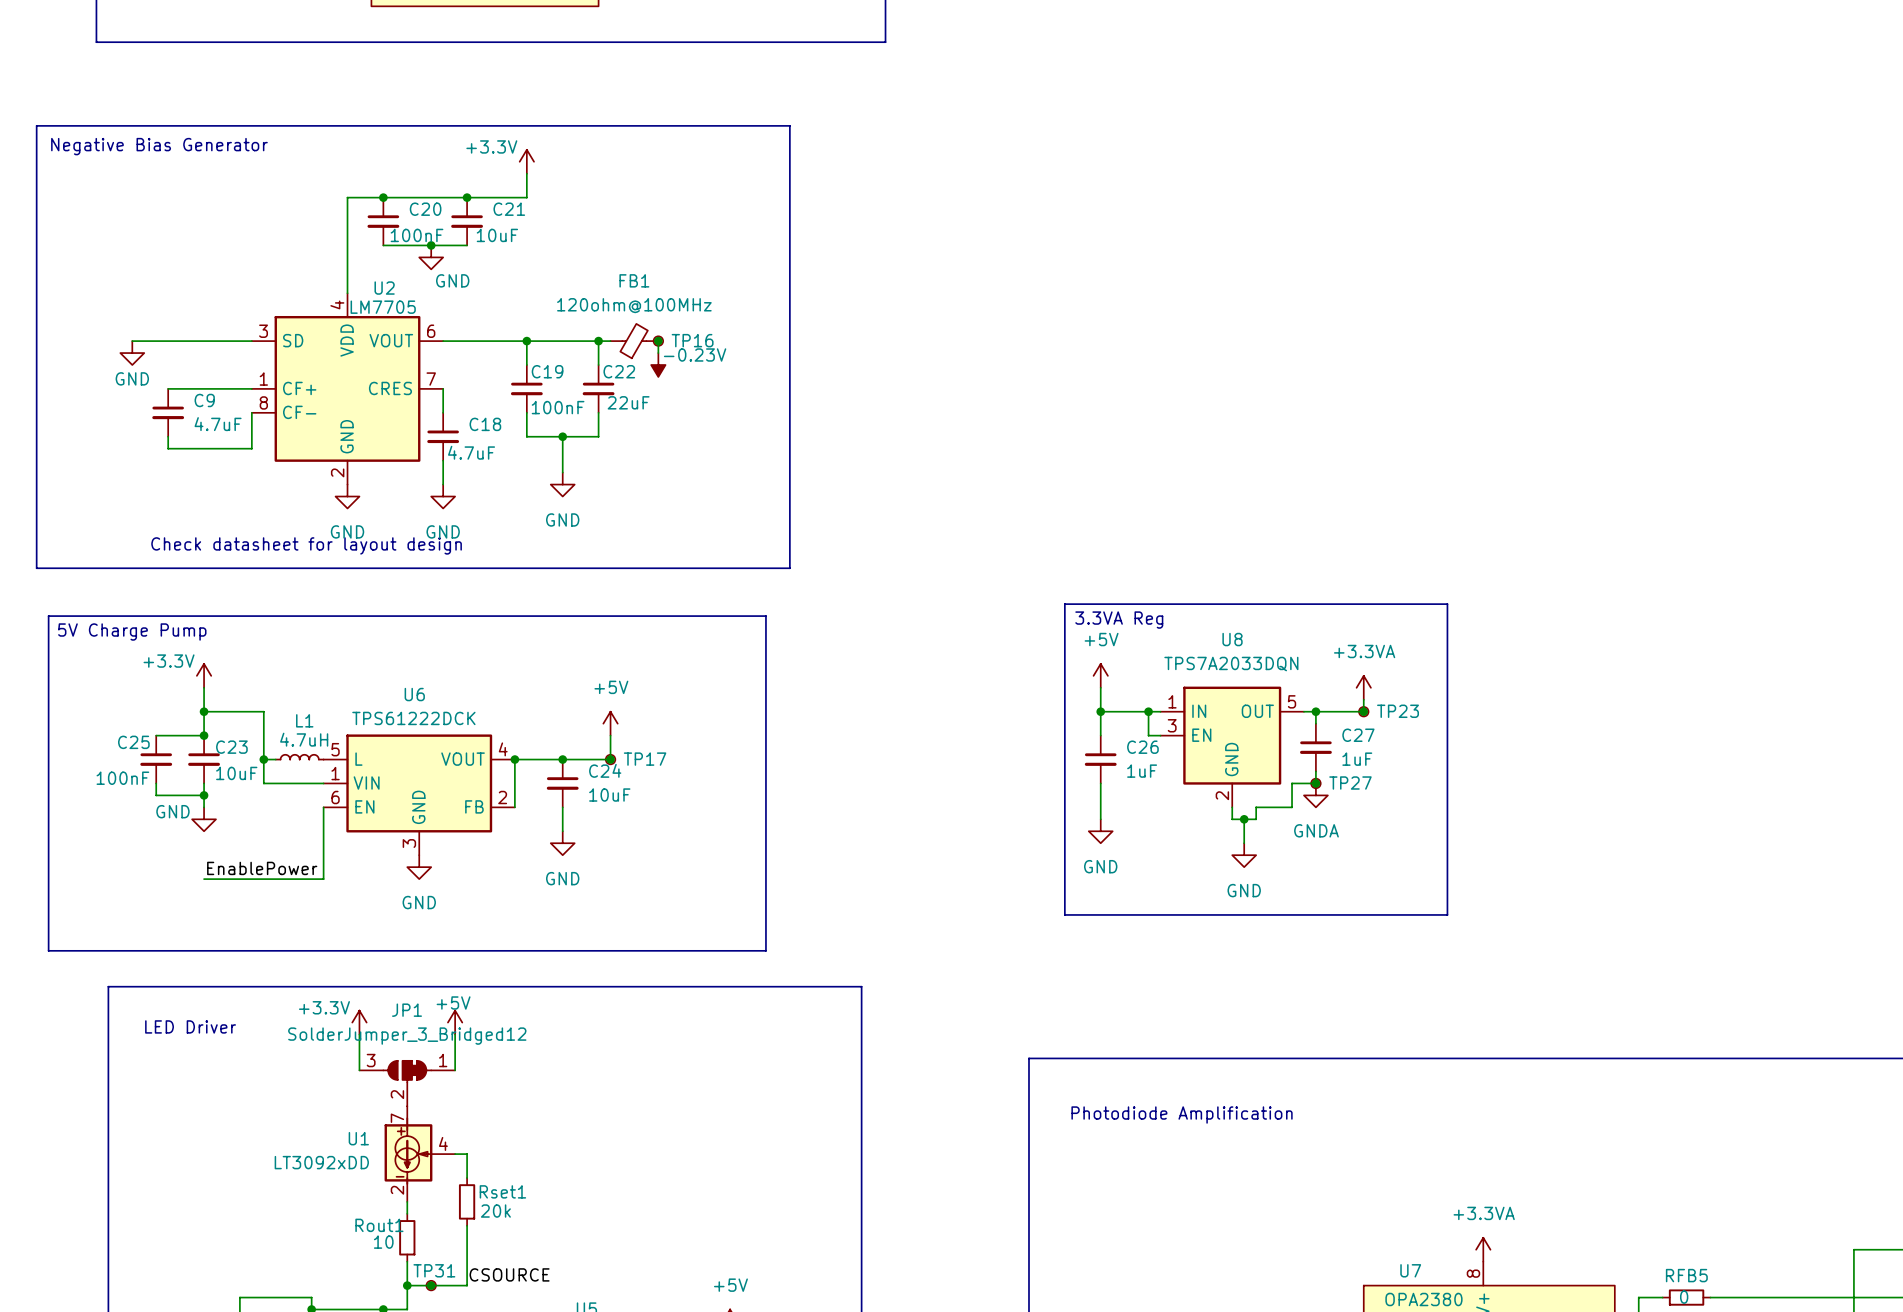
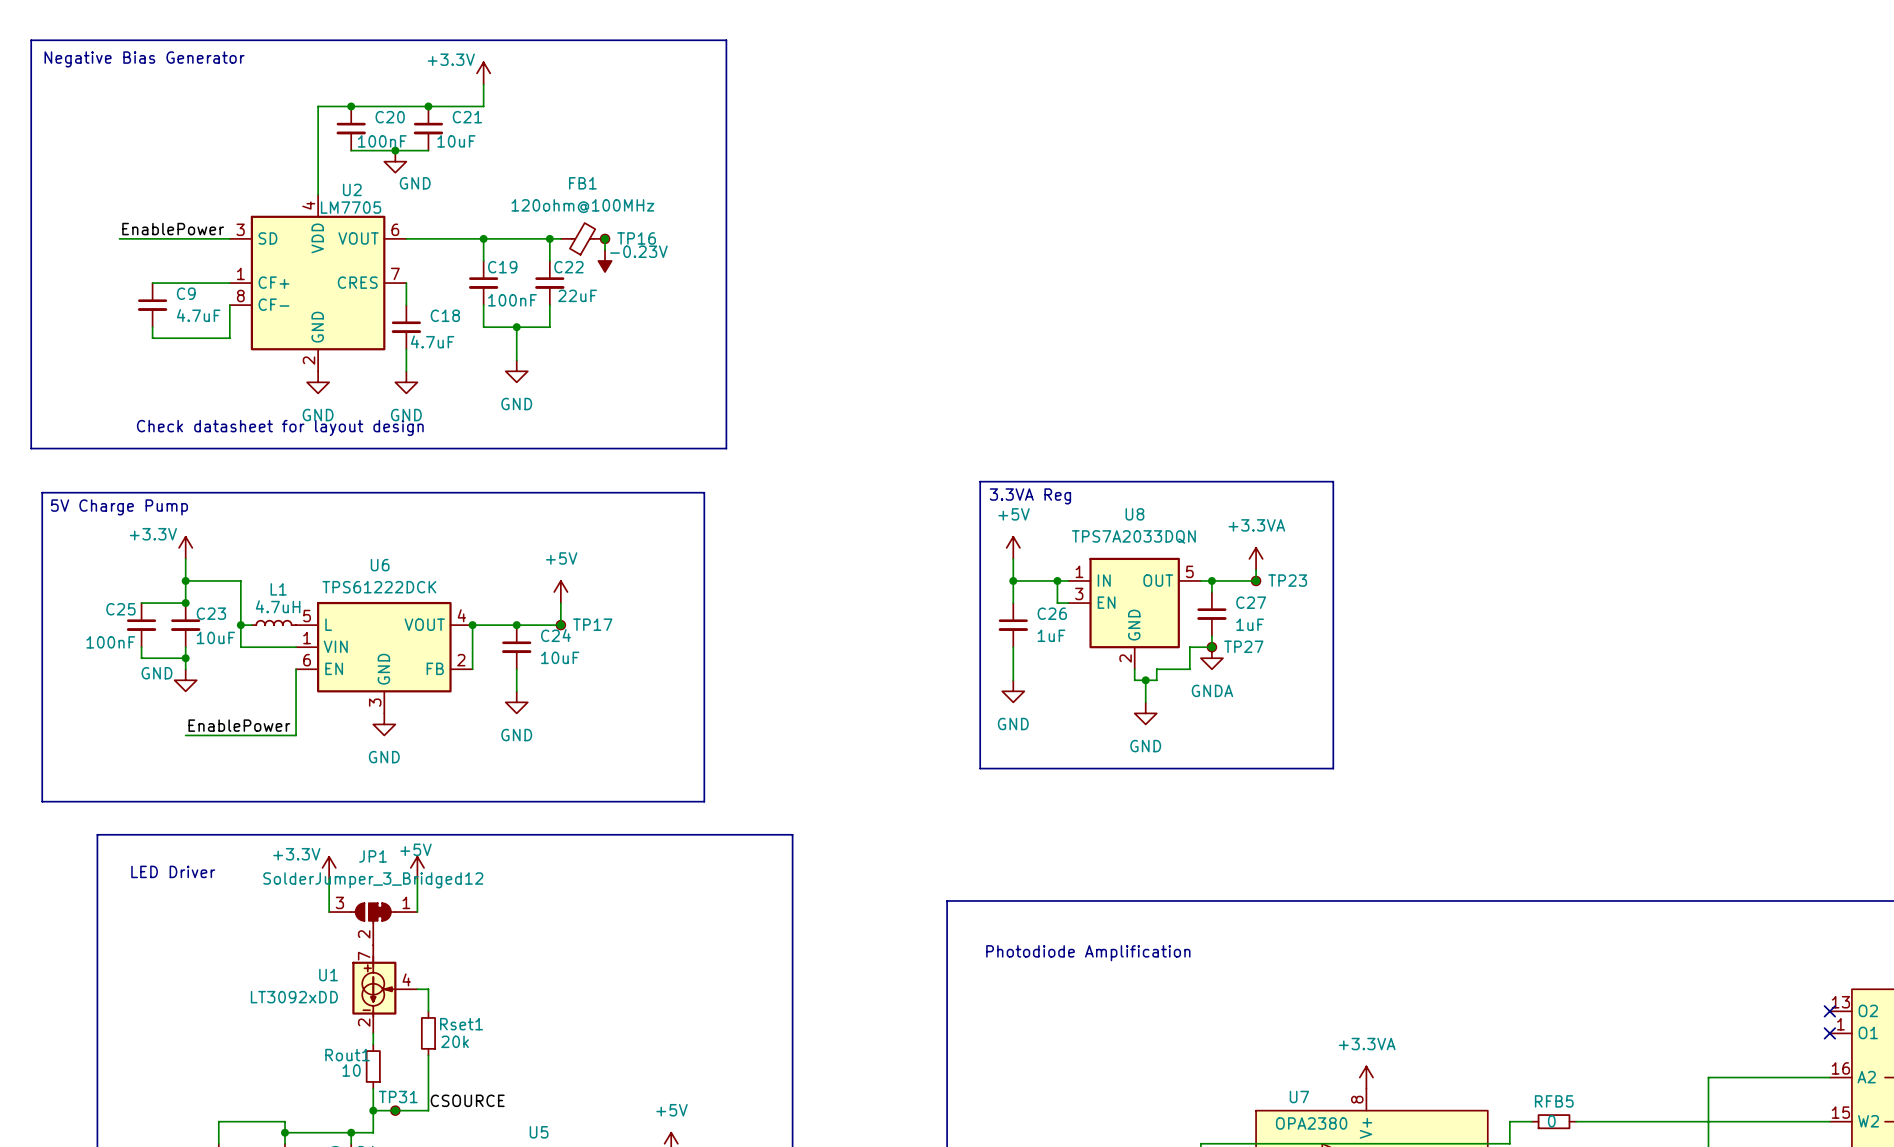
label: none -> EnablePower (173, 229)
power symbol: GND (132, 353) -> none

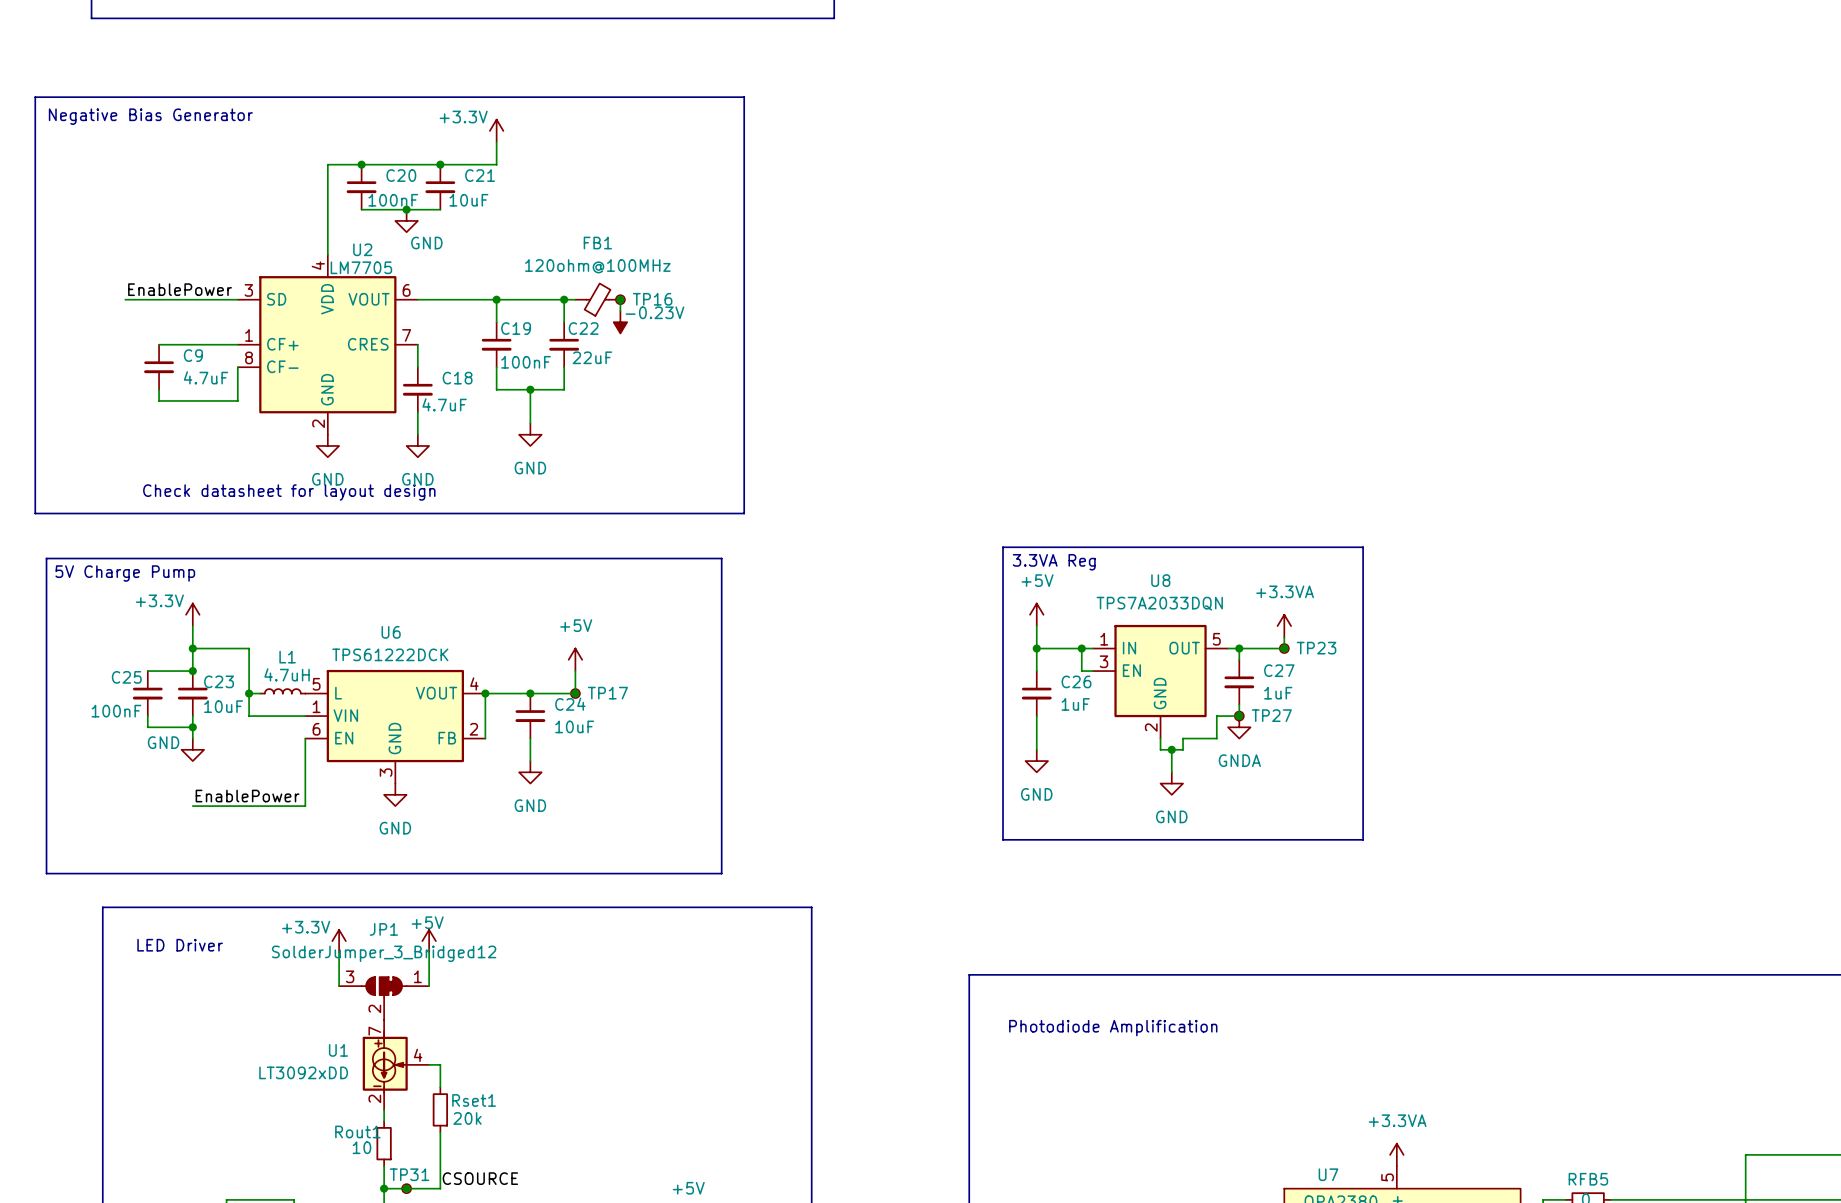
U7 pin number: 8 (1357, 1099) -> 5 (1387, 1177)

